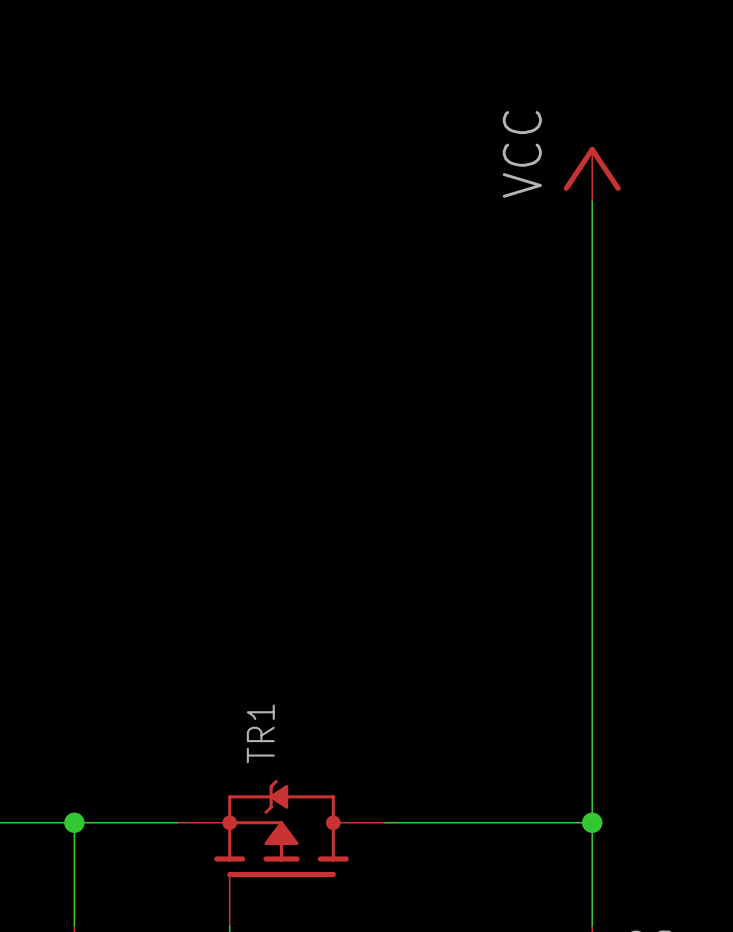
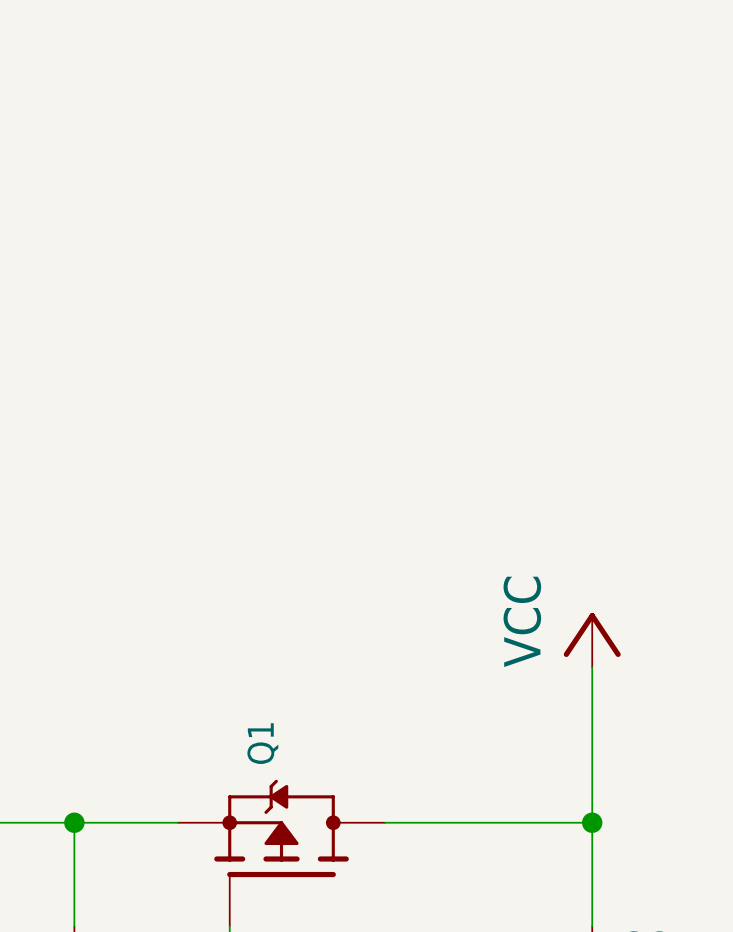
power symbol position: VCC (592, 174) -> VCC (592, 640)
wire: (592, 201) (592, 667) -> none
TR1 name: TR1 (260, 733) -> Q1 (262, 743)

